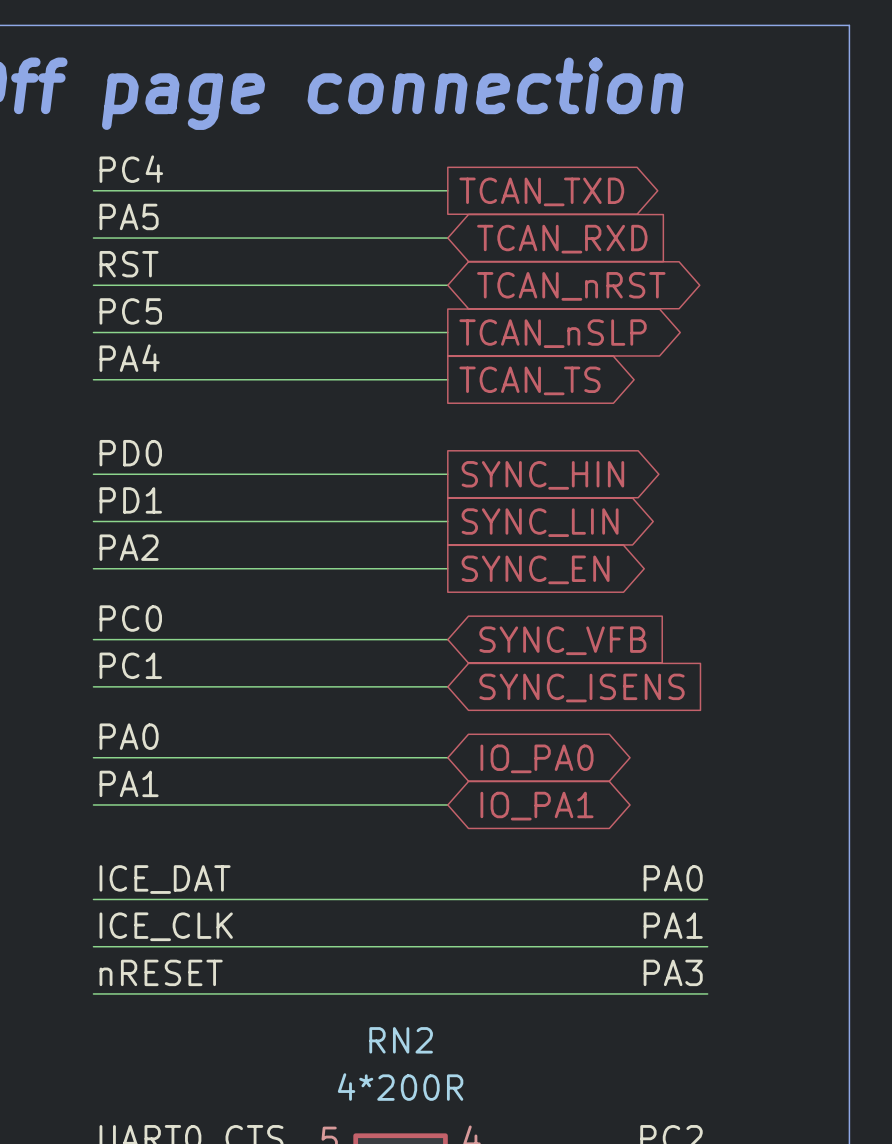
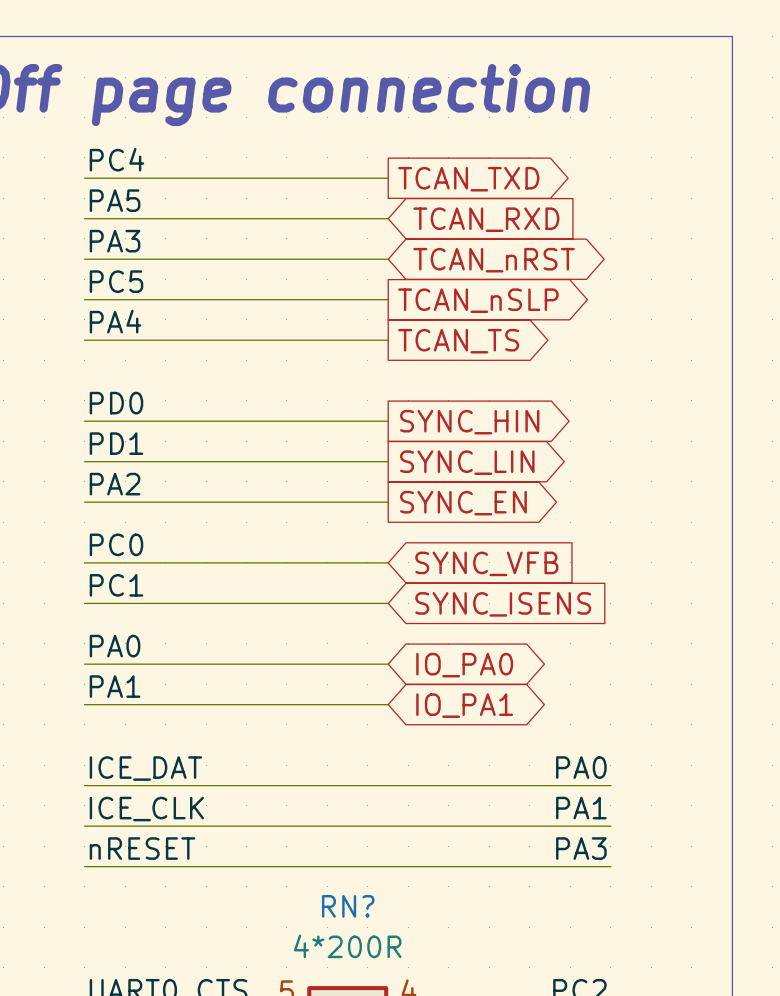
label: RST (129, 264) -> PA3 (115, 241)
RN2 name: RN2 (401, 1040) -> RN? (348, 906)

